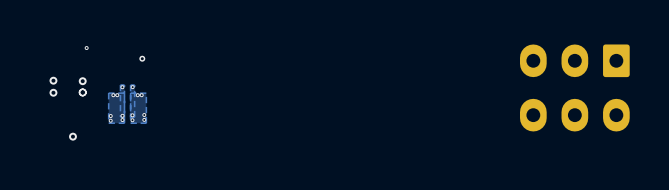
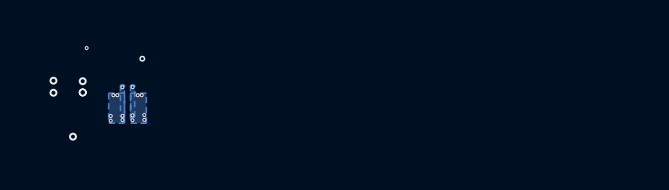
part: (574, 87) -> none

